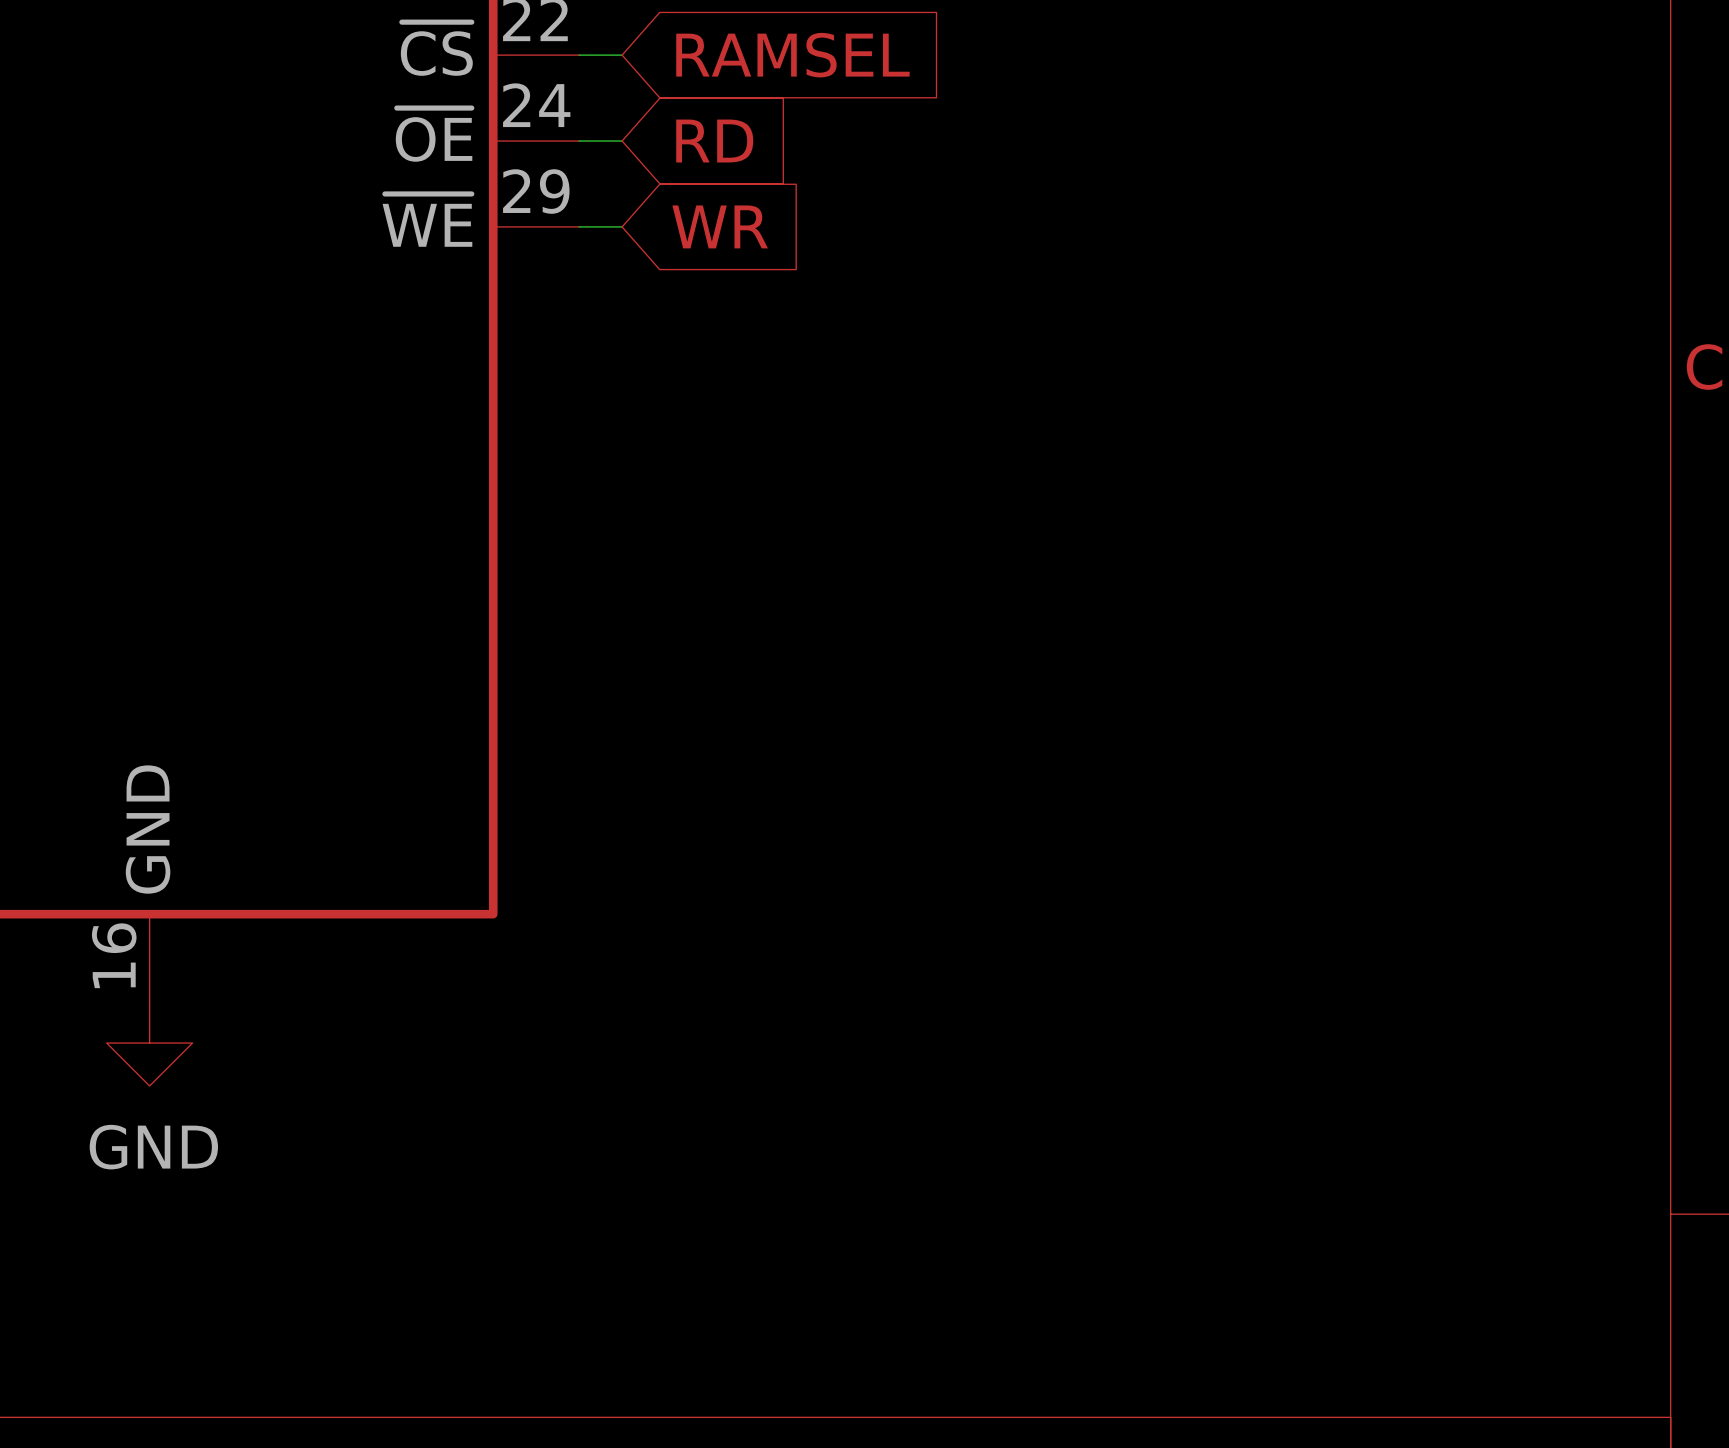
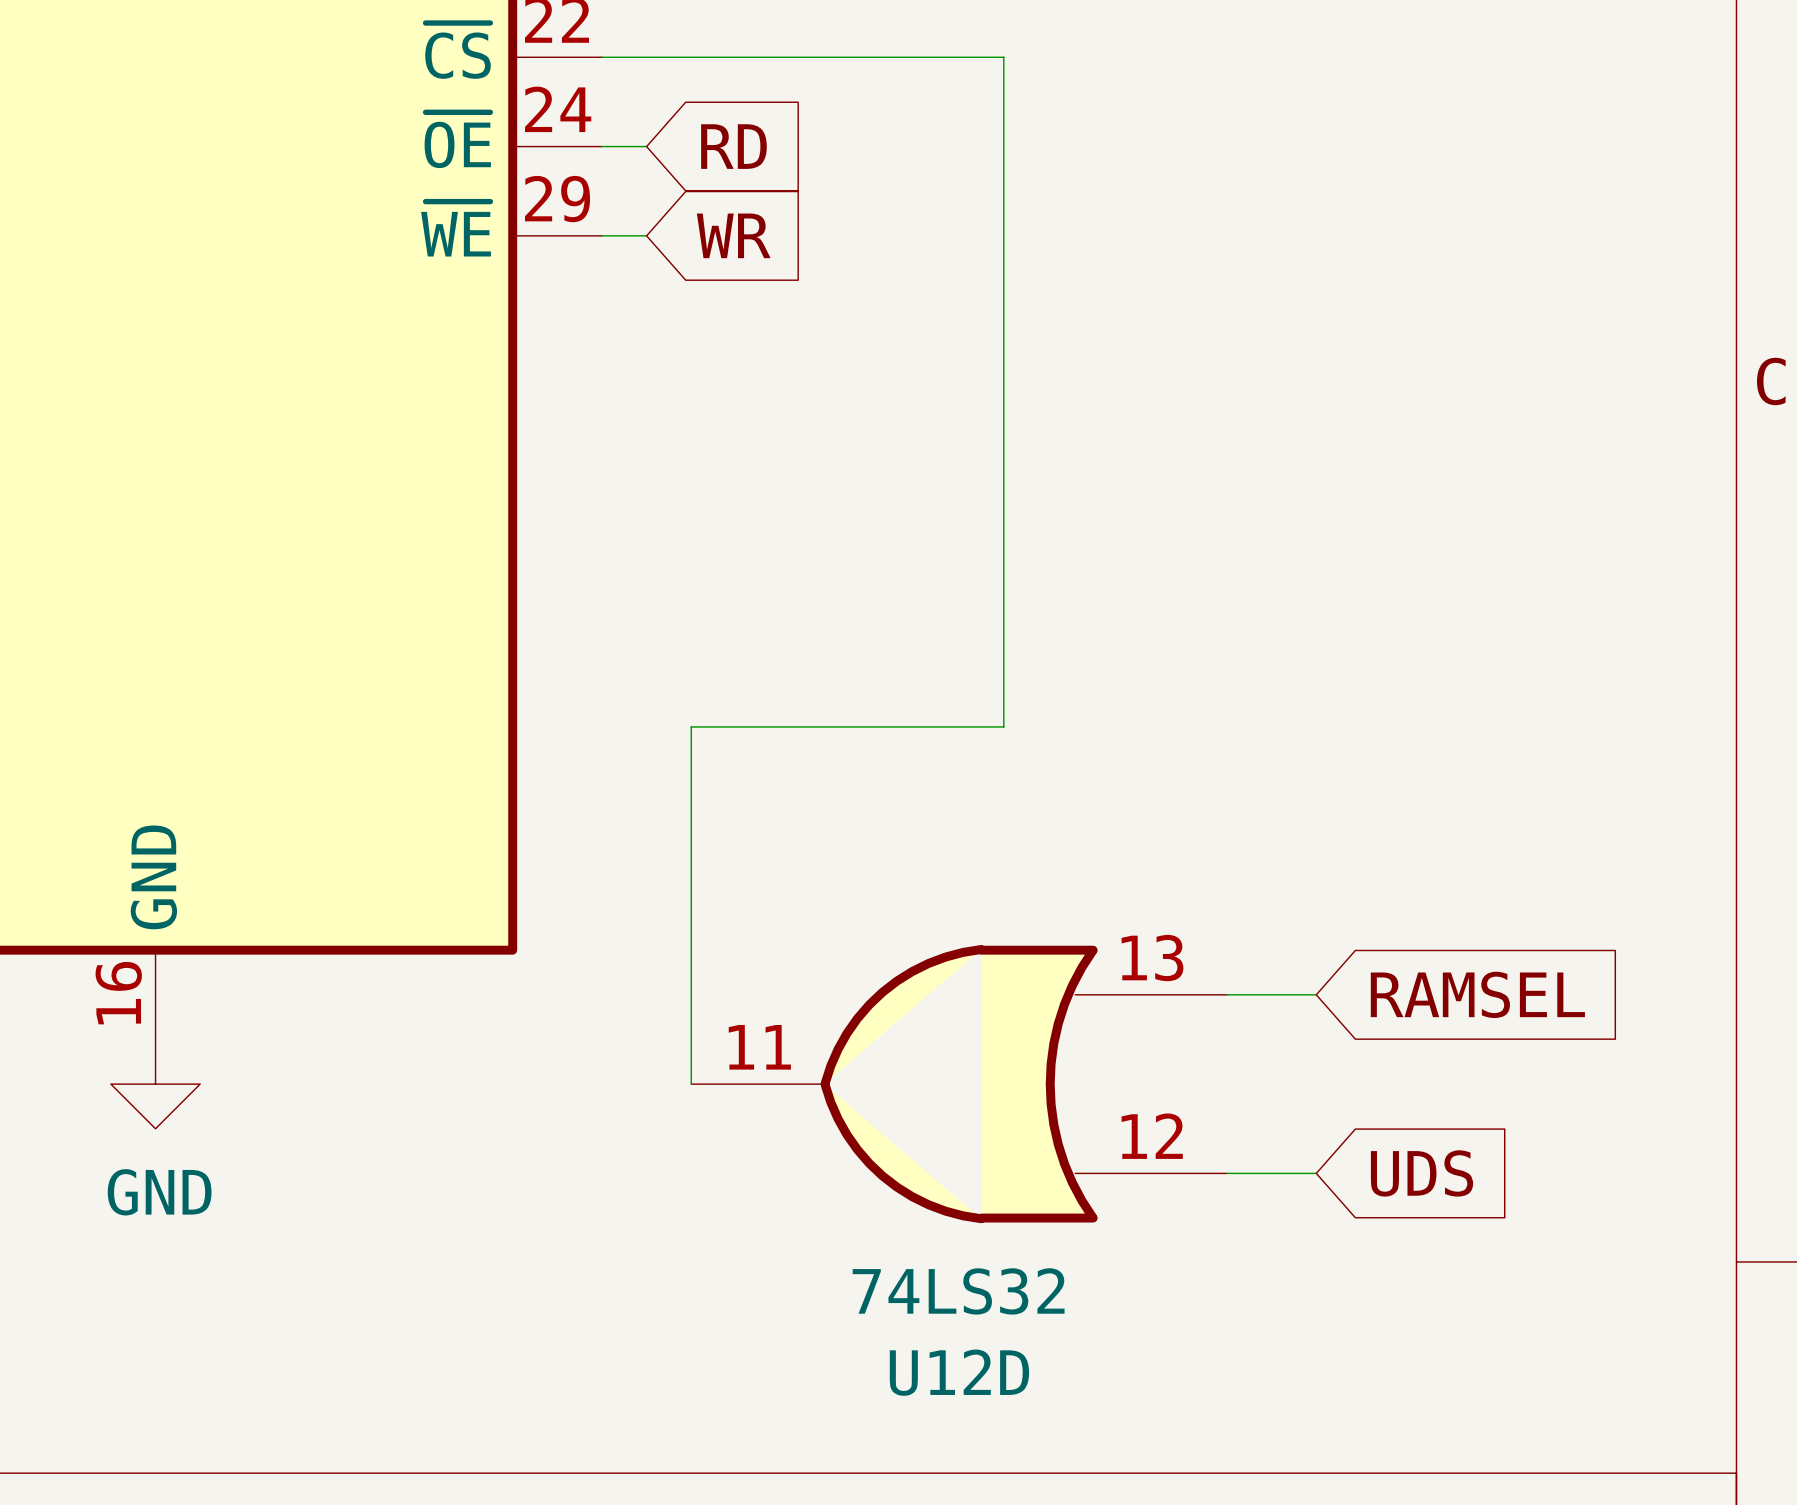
wire: none -> (646, 57) (1003, 57) (1003, 726) (691, 726) (691, 1084)
global label: RAMSEL (792, 55) -> none
wire: none -> (1227, 994) (1316, 994)
global label: none -> RAMSEL (1477, 994)
U12D: none -> 74LS32 (959, 1084)
wire: none -> (1227, 1173) (1316, 1173)
global label: none -> UDS (1422, 1173)

